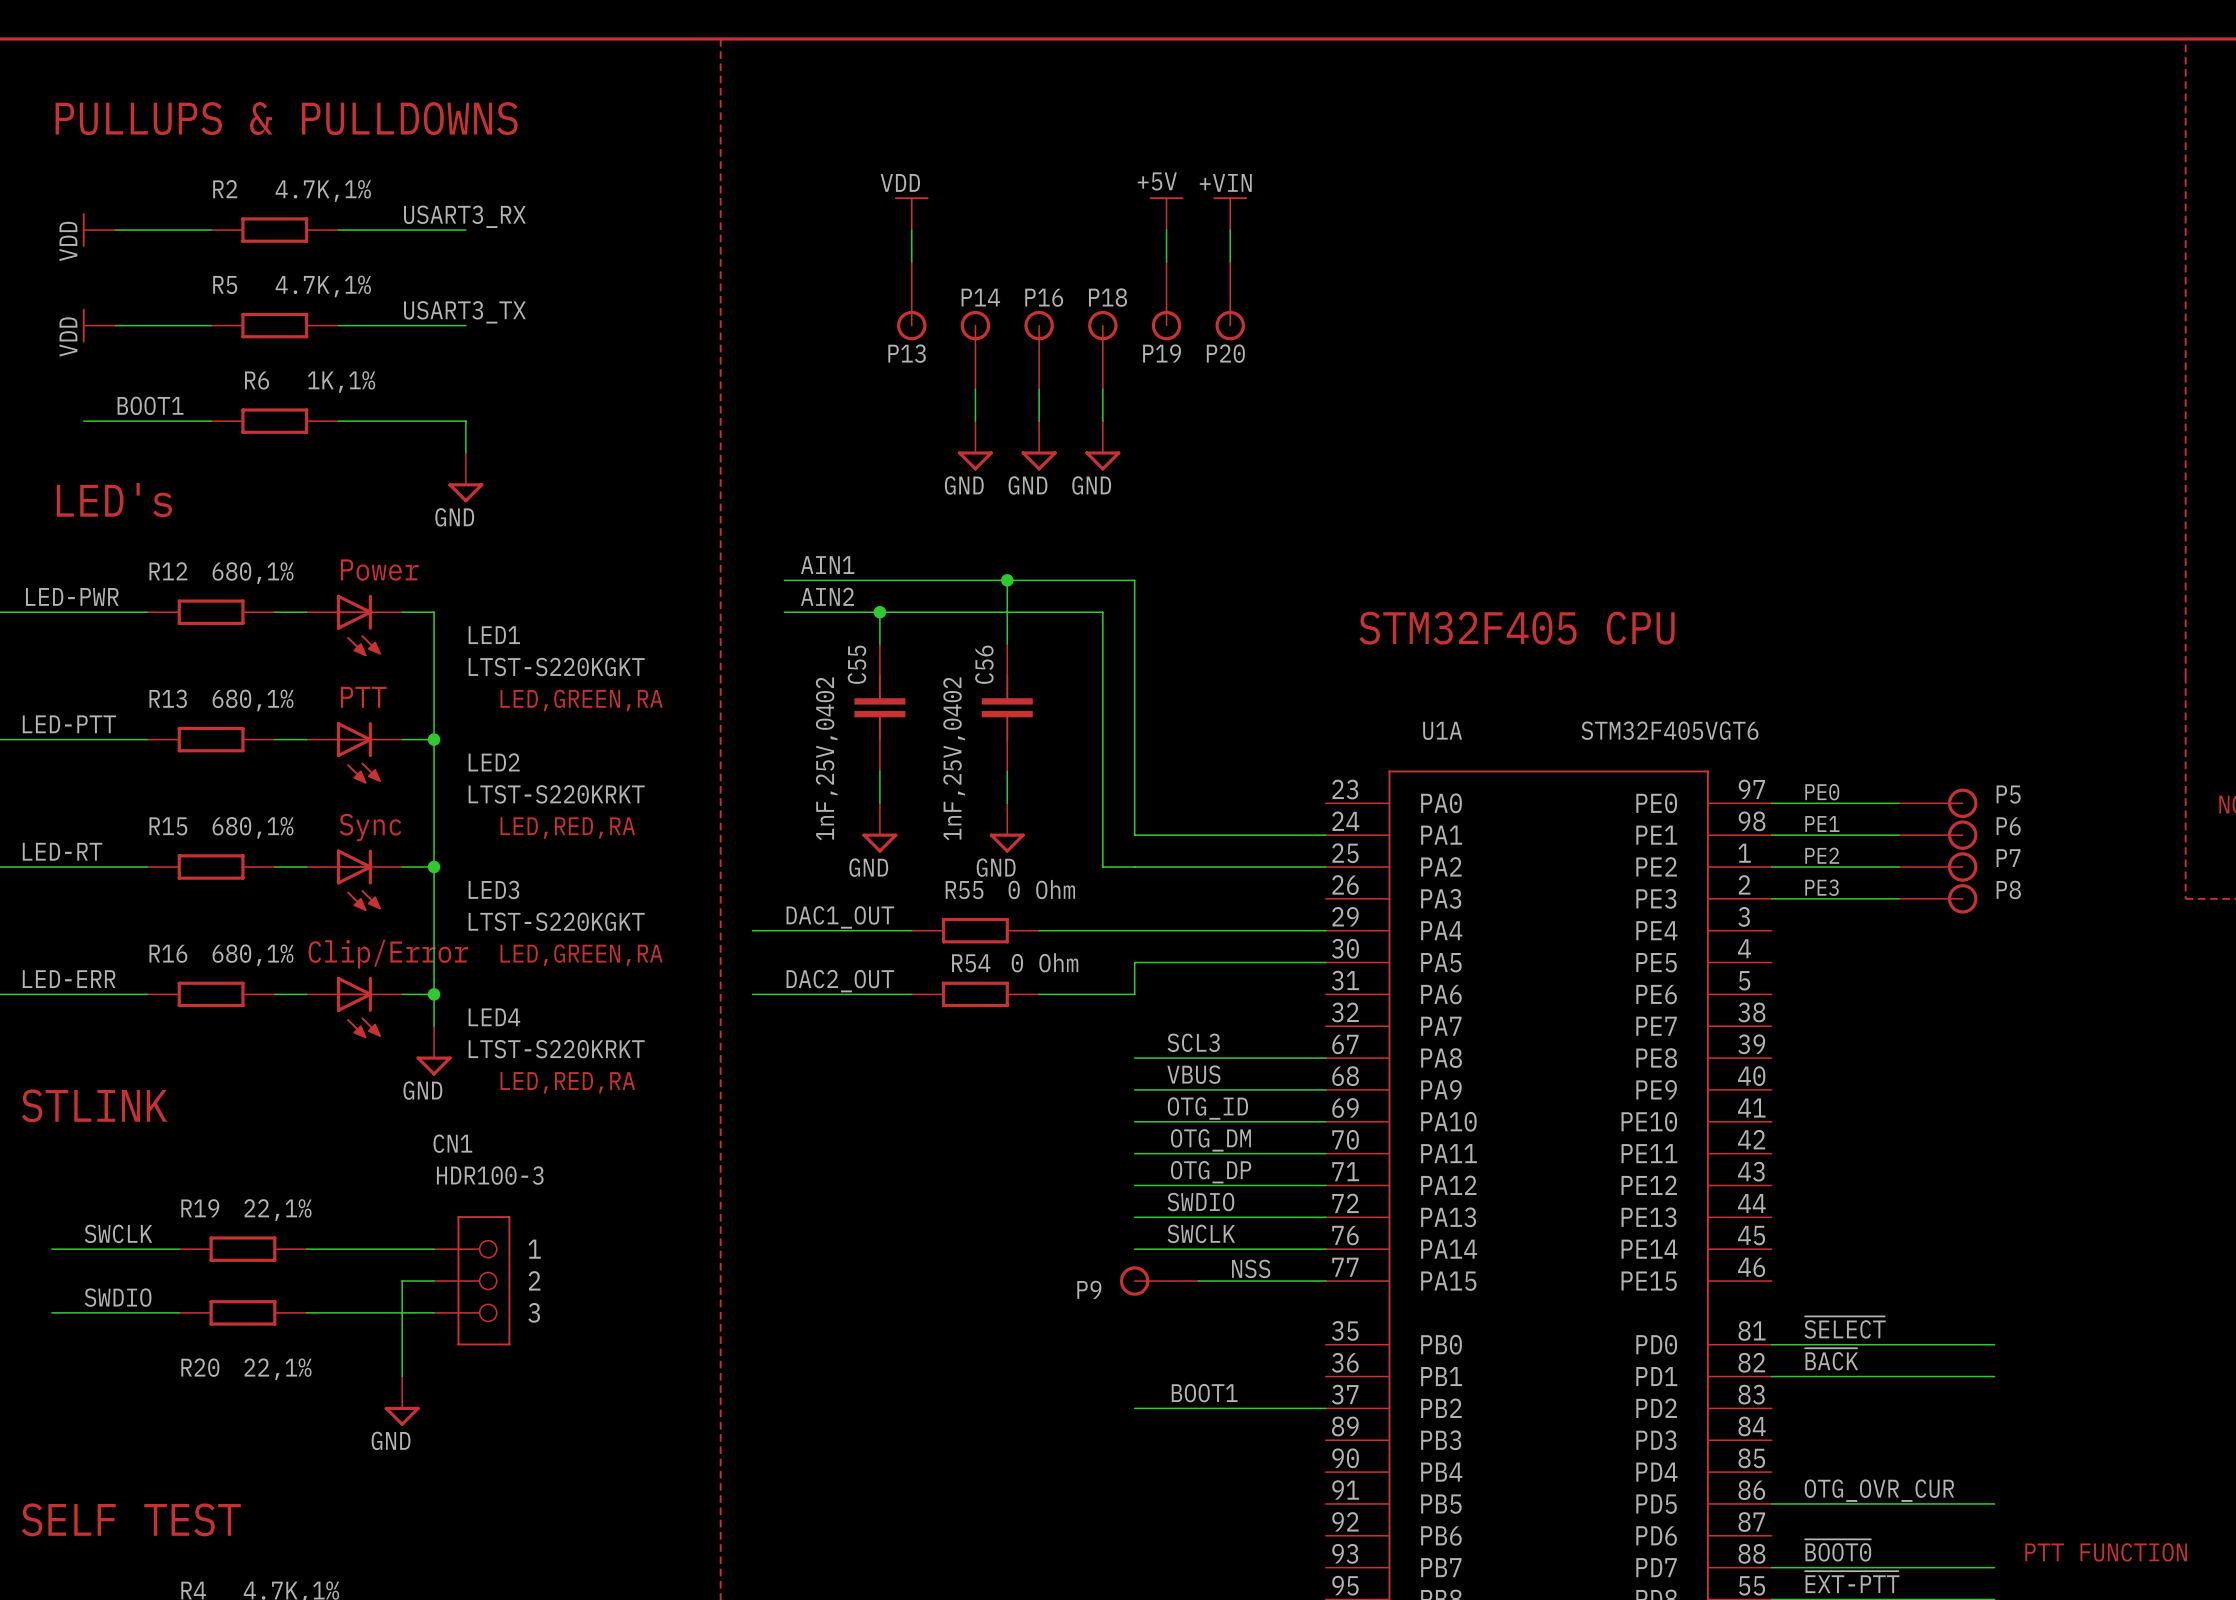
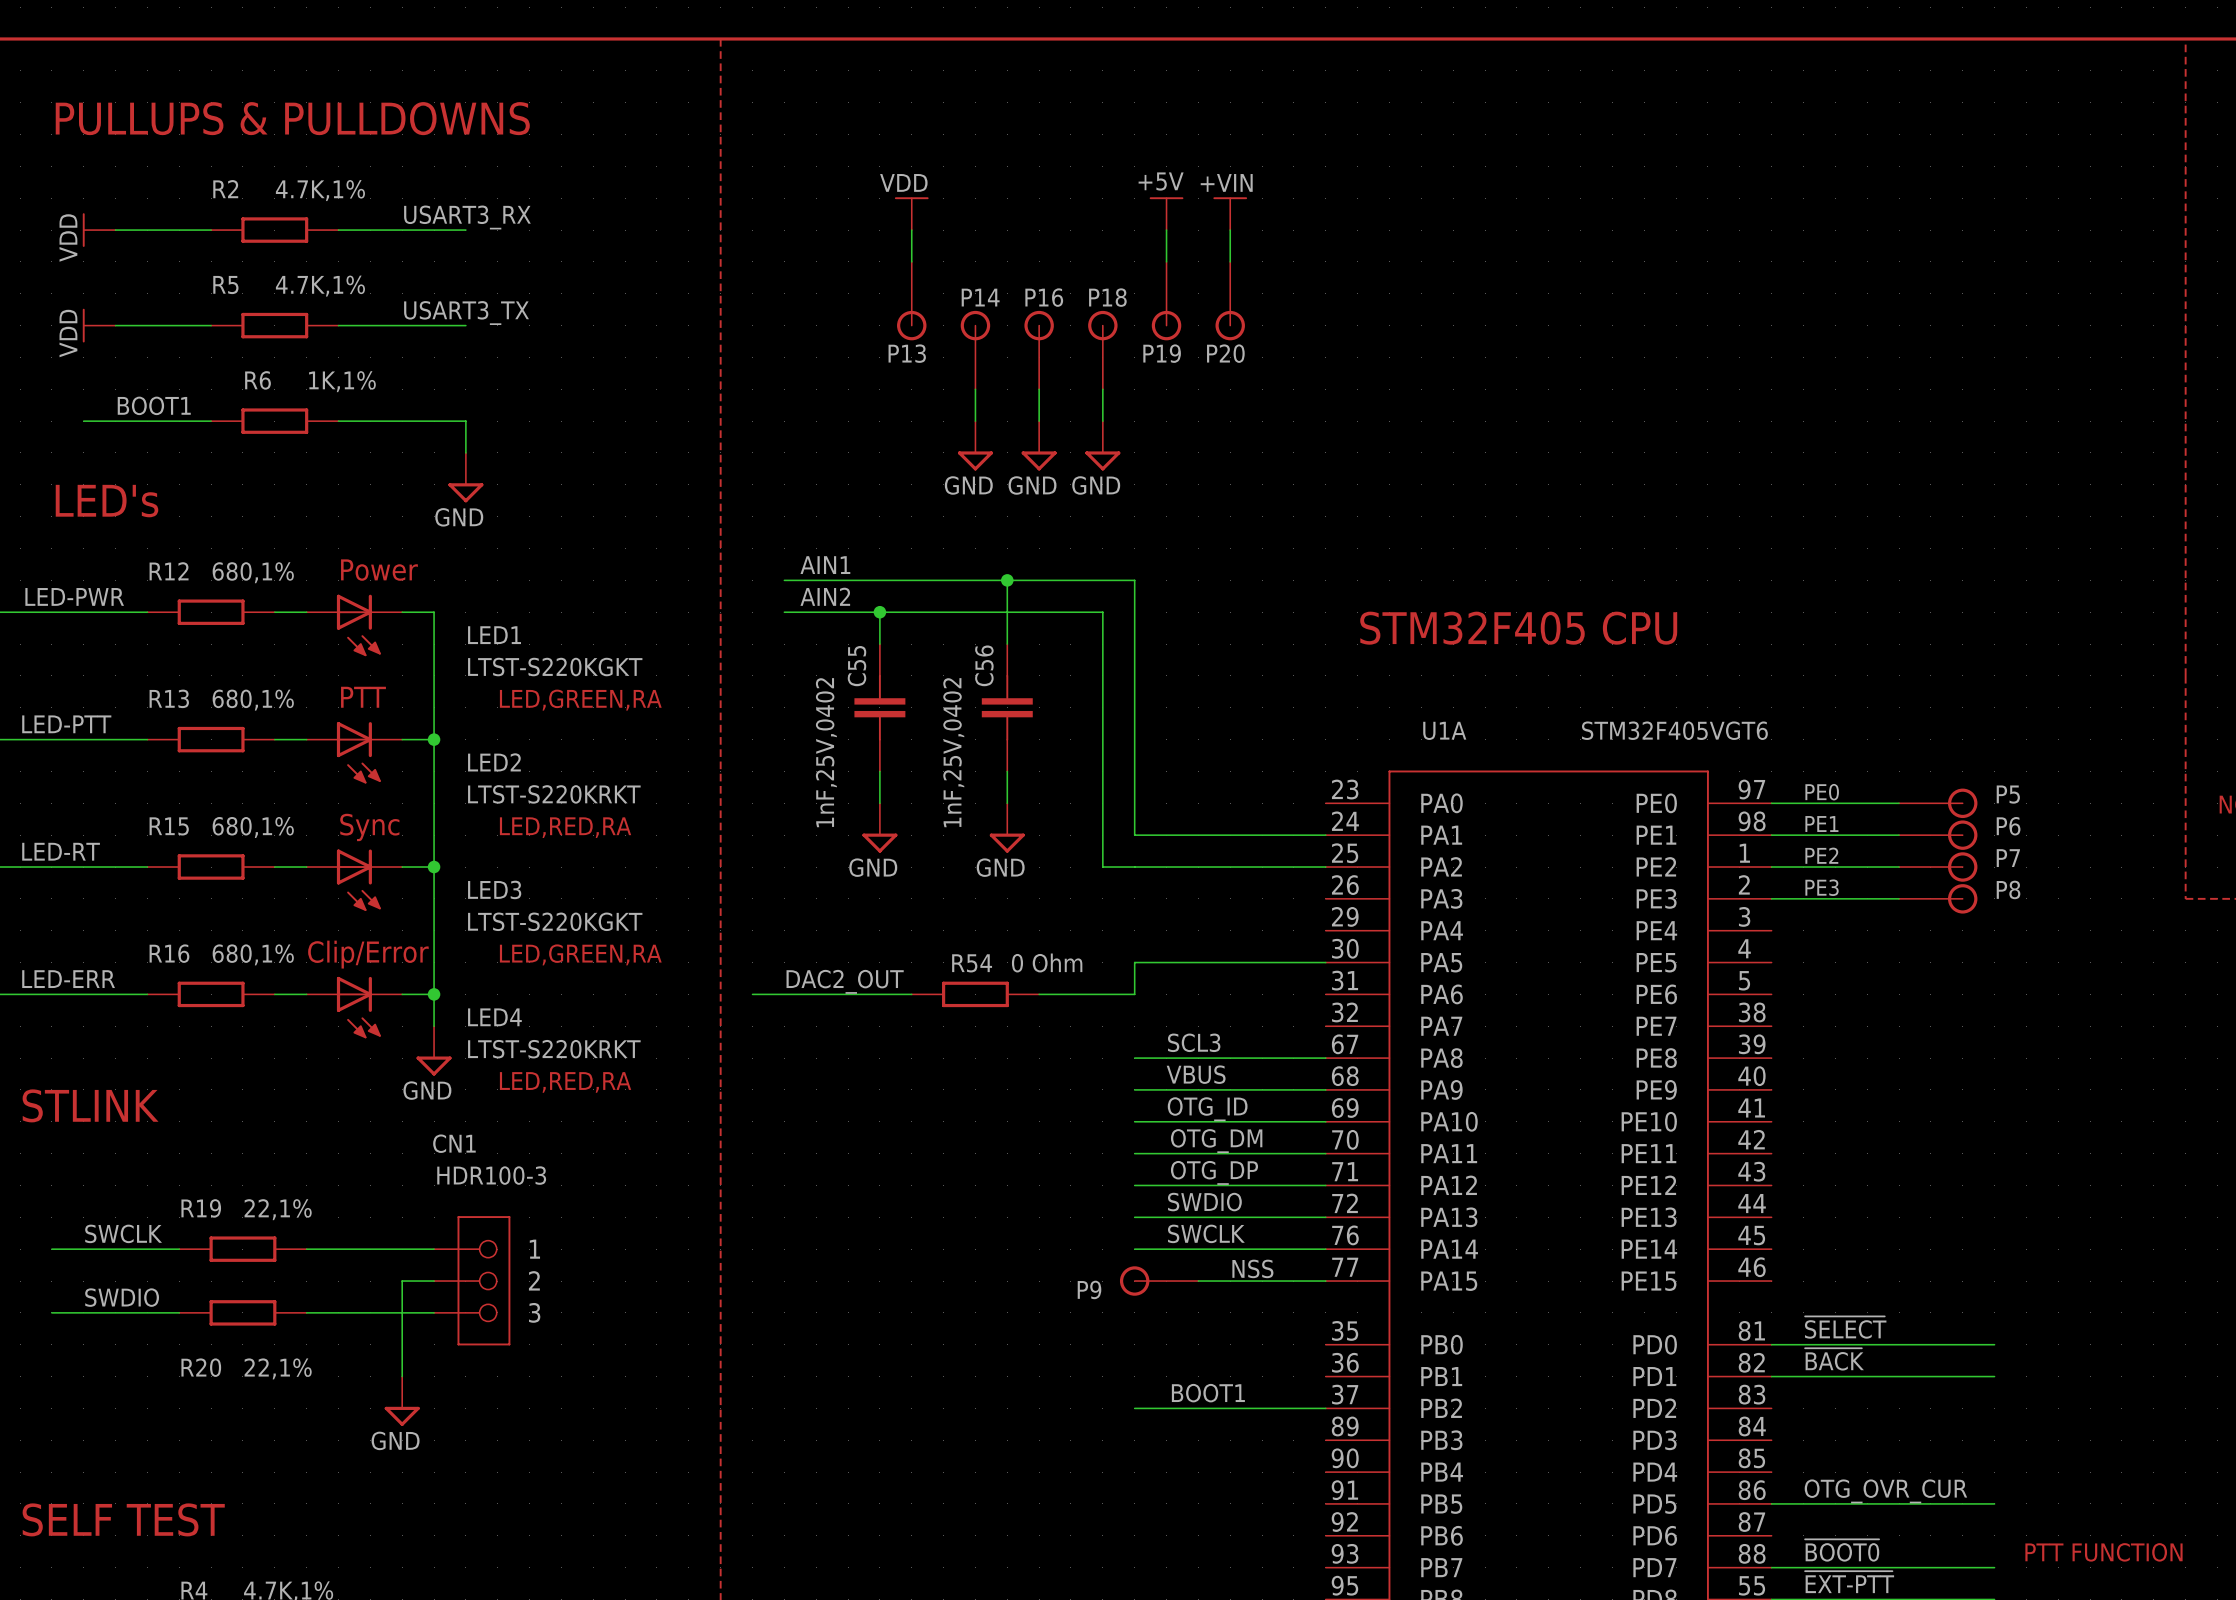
label: DAC1_OUT (840, 917) -> none
wire: (752, 930) (911, 930) -> none
R55: 0 Ohm (975, 930) -> none
wire: (1039, 930) (1325, 930) -> none

